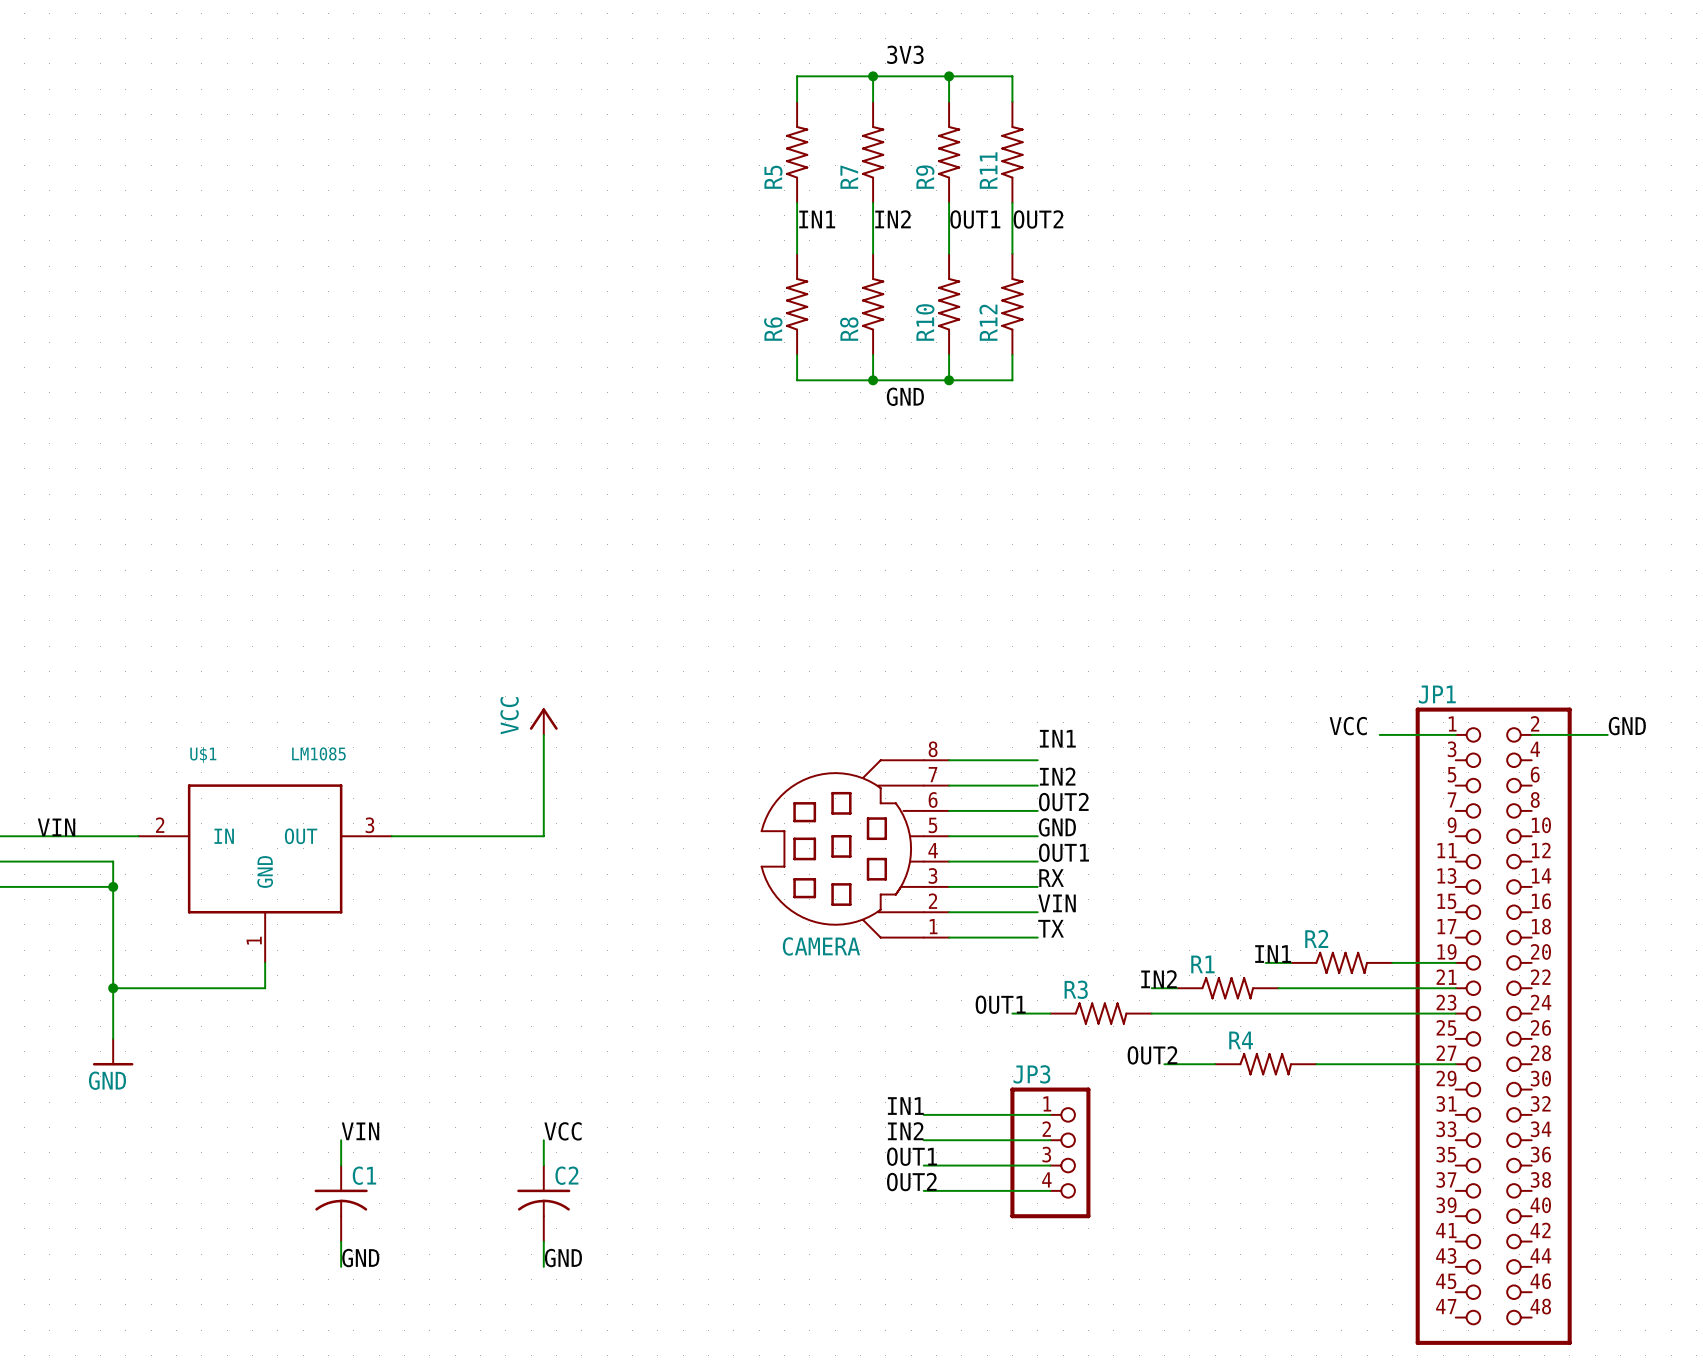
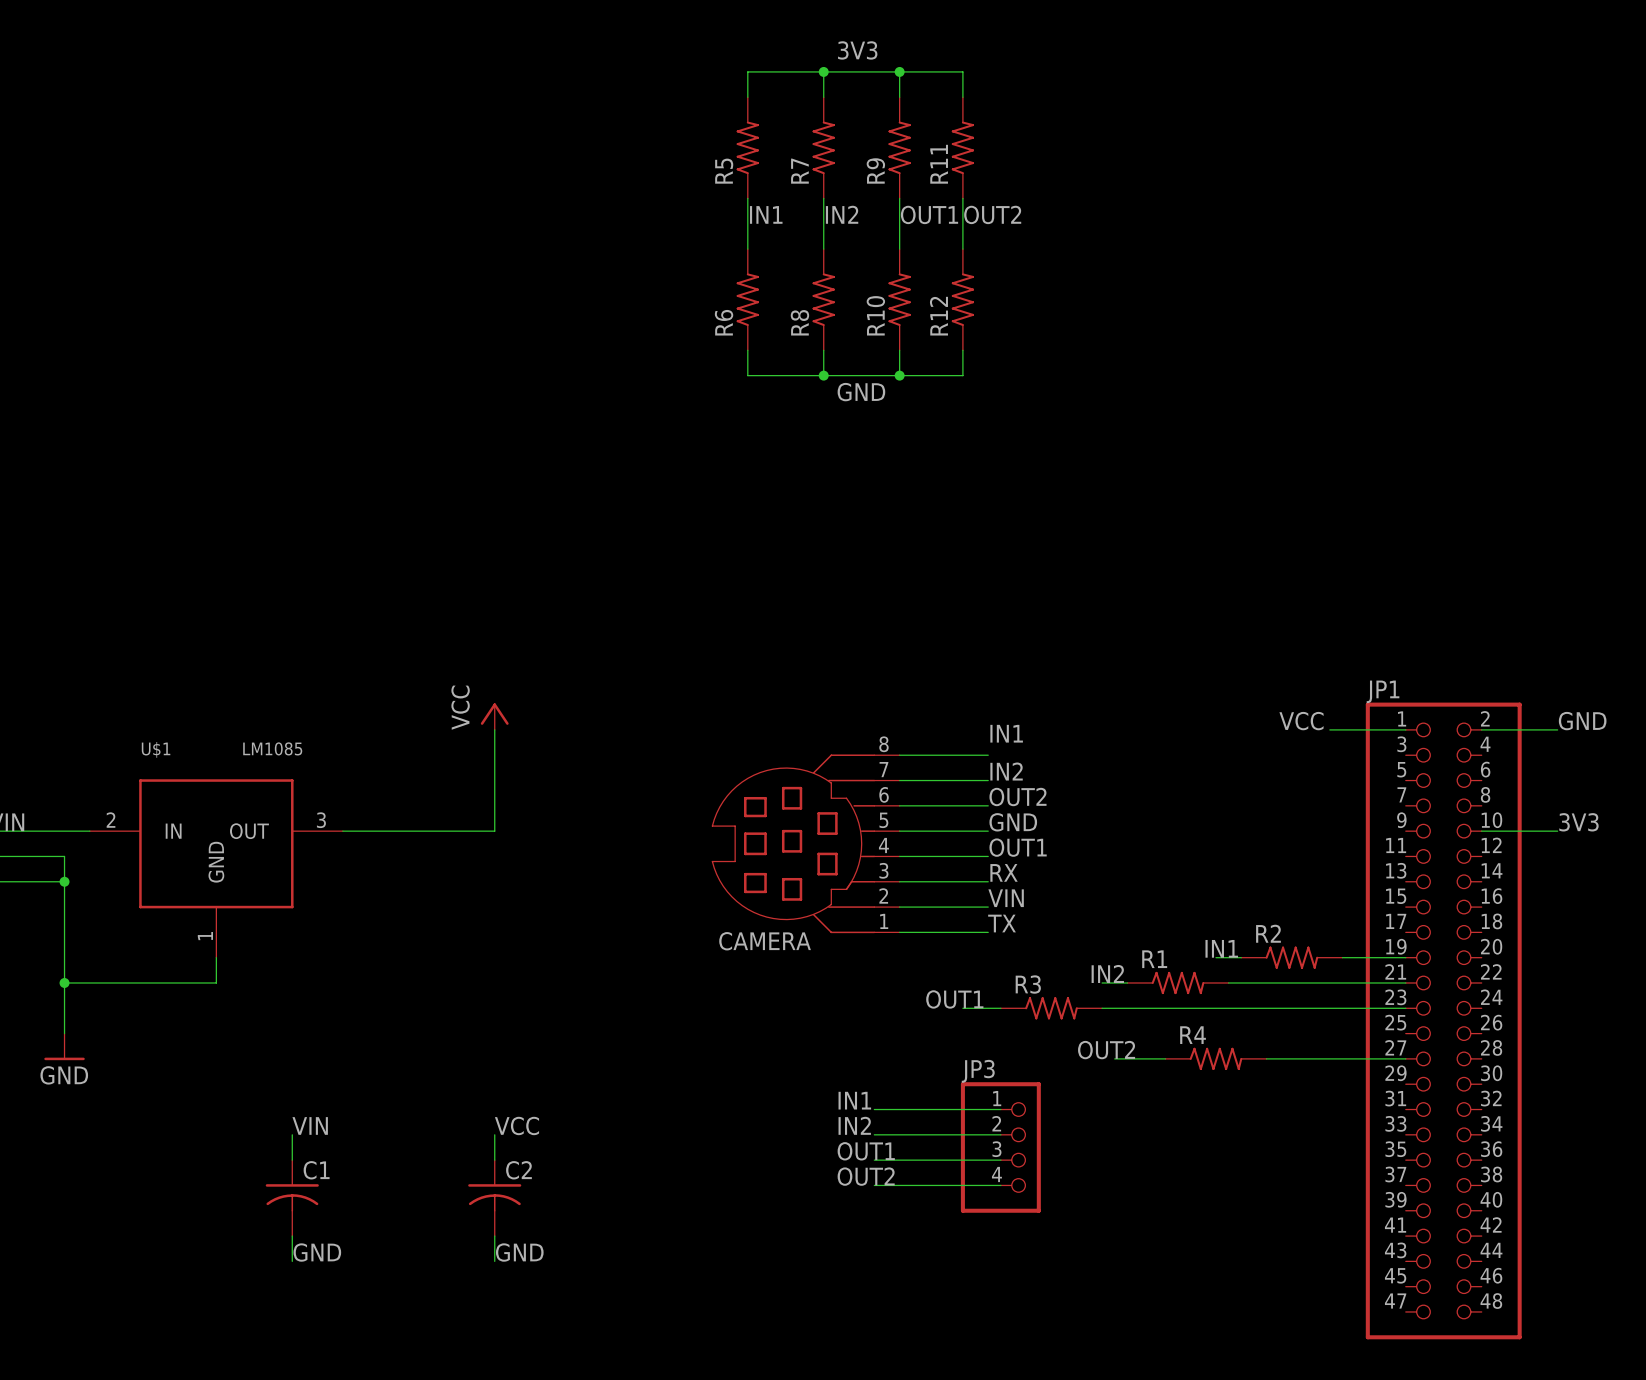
label: none -> 3V3 (1578, 822)
wire: none -> (1481, 831) (1557, 831)

